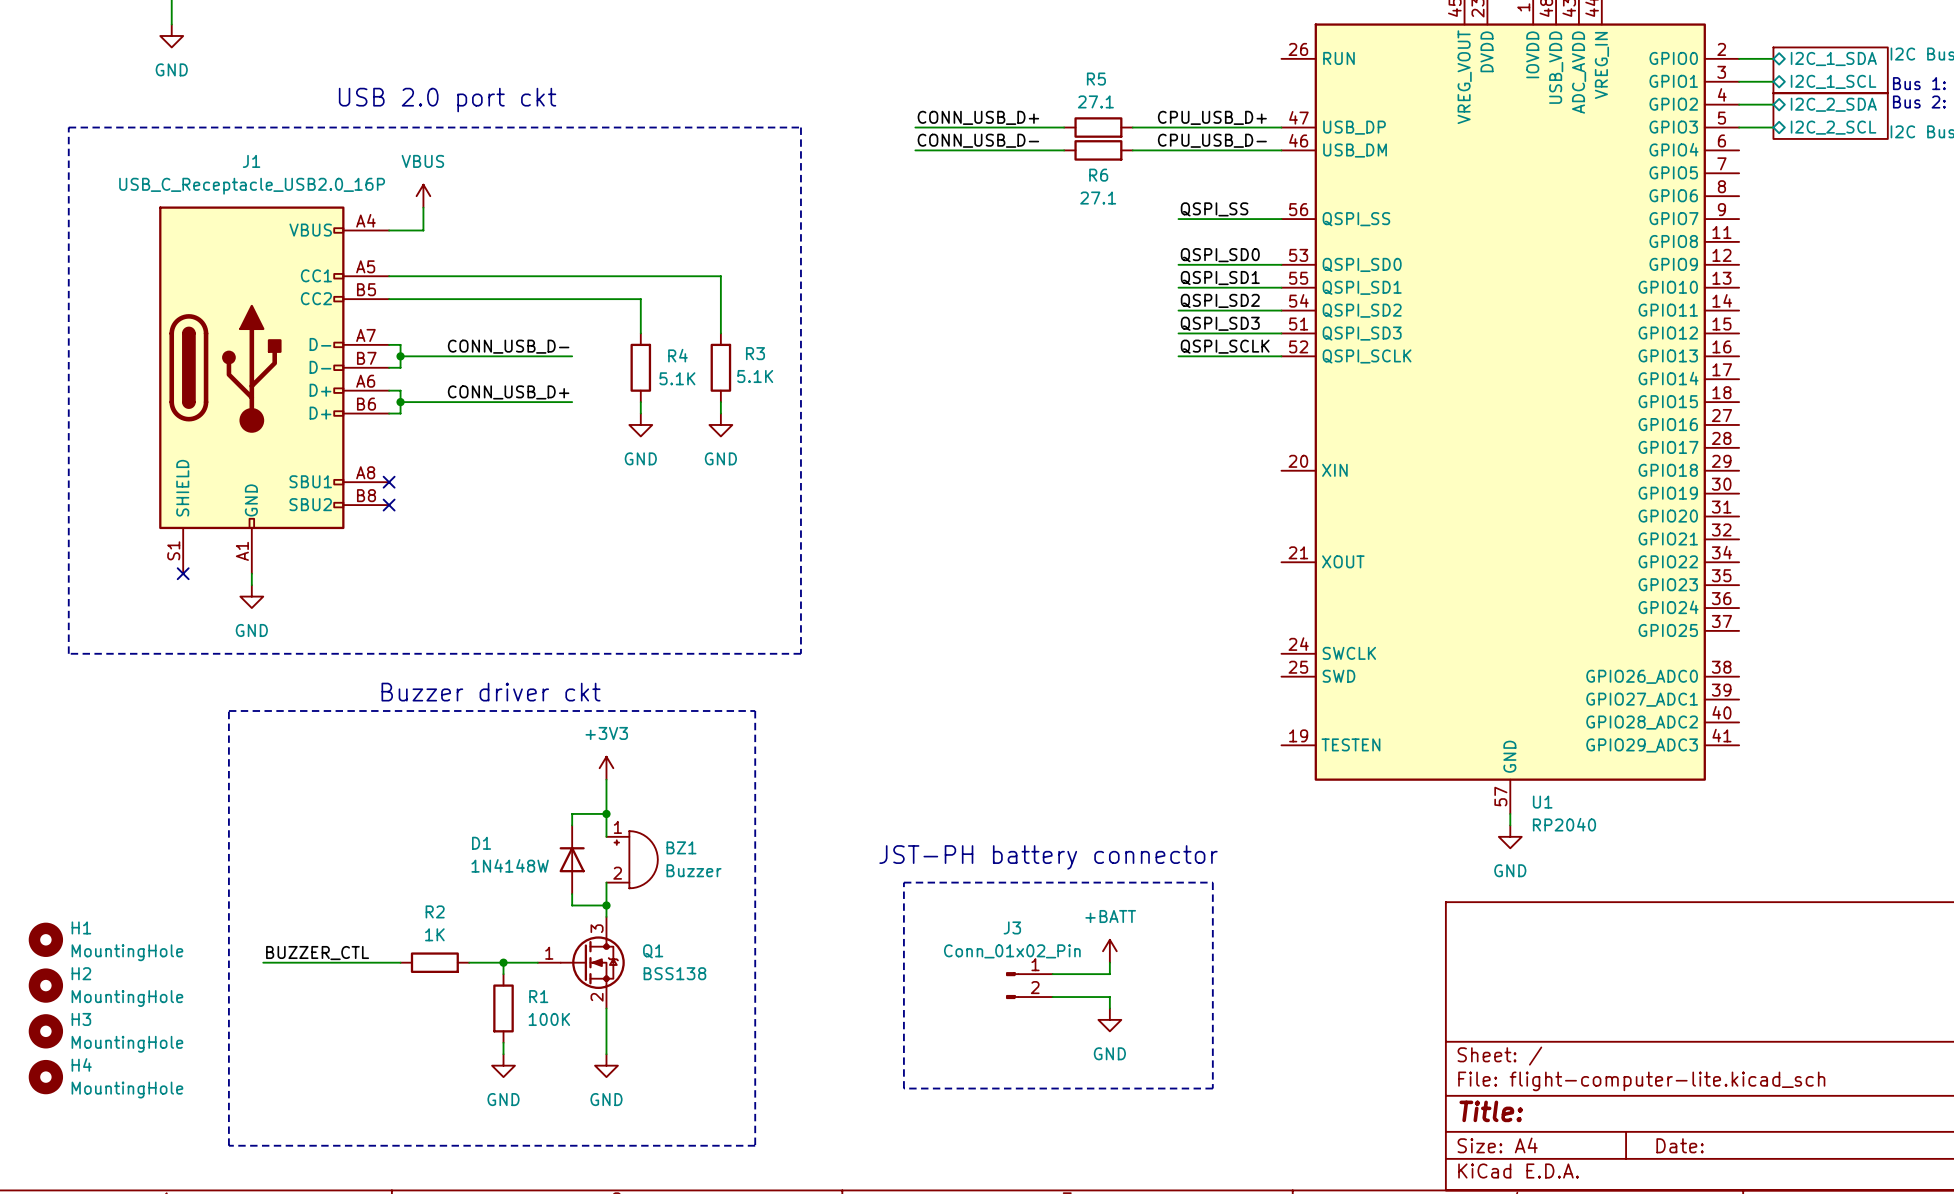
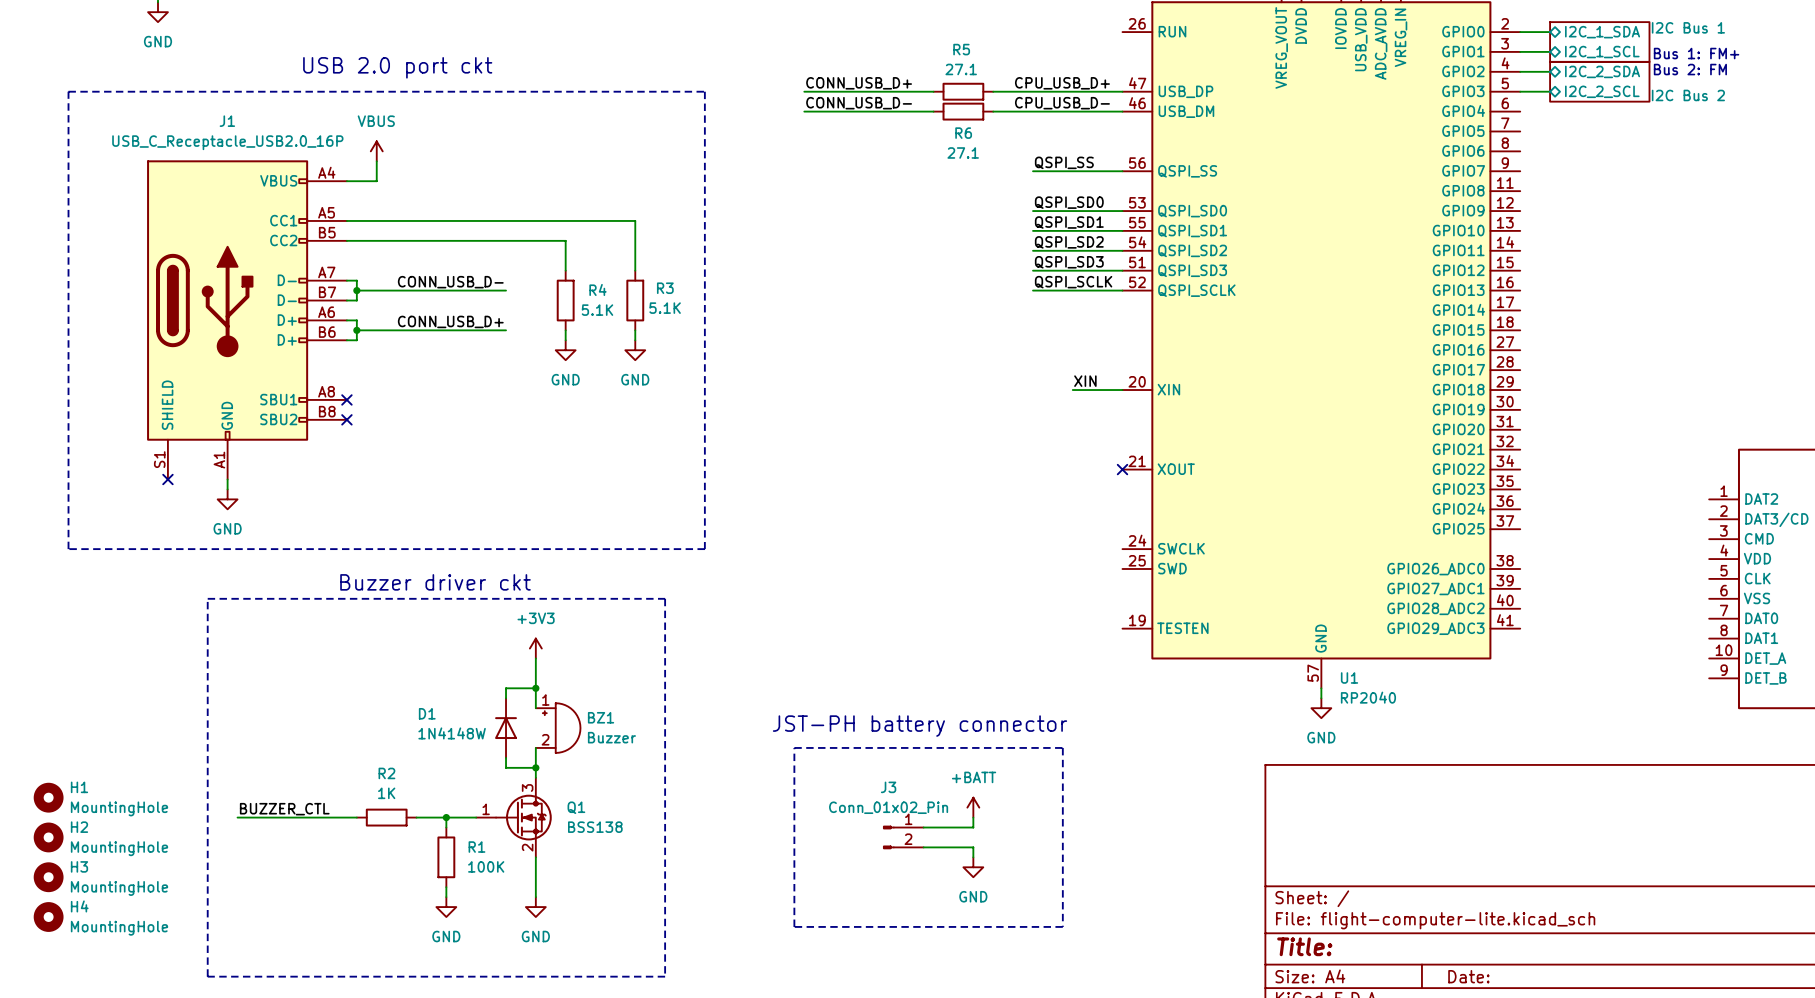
label: none -> XIN (1085, 381)
wire: none -> (1072, 390) (1122, 390)
no-connect mark: none -> (1122, 469)

